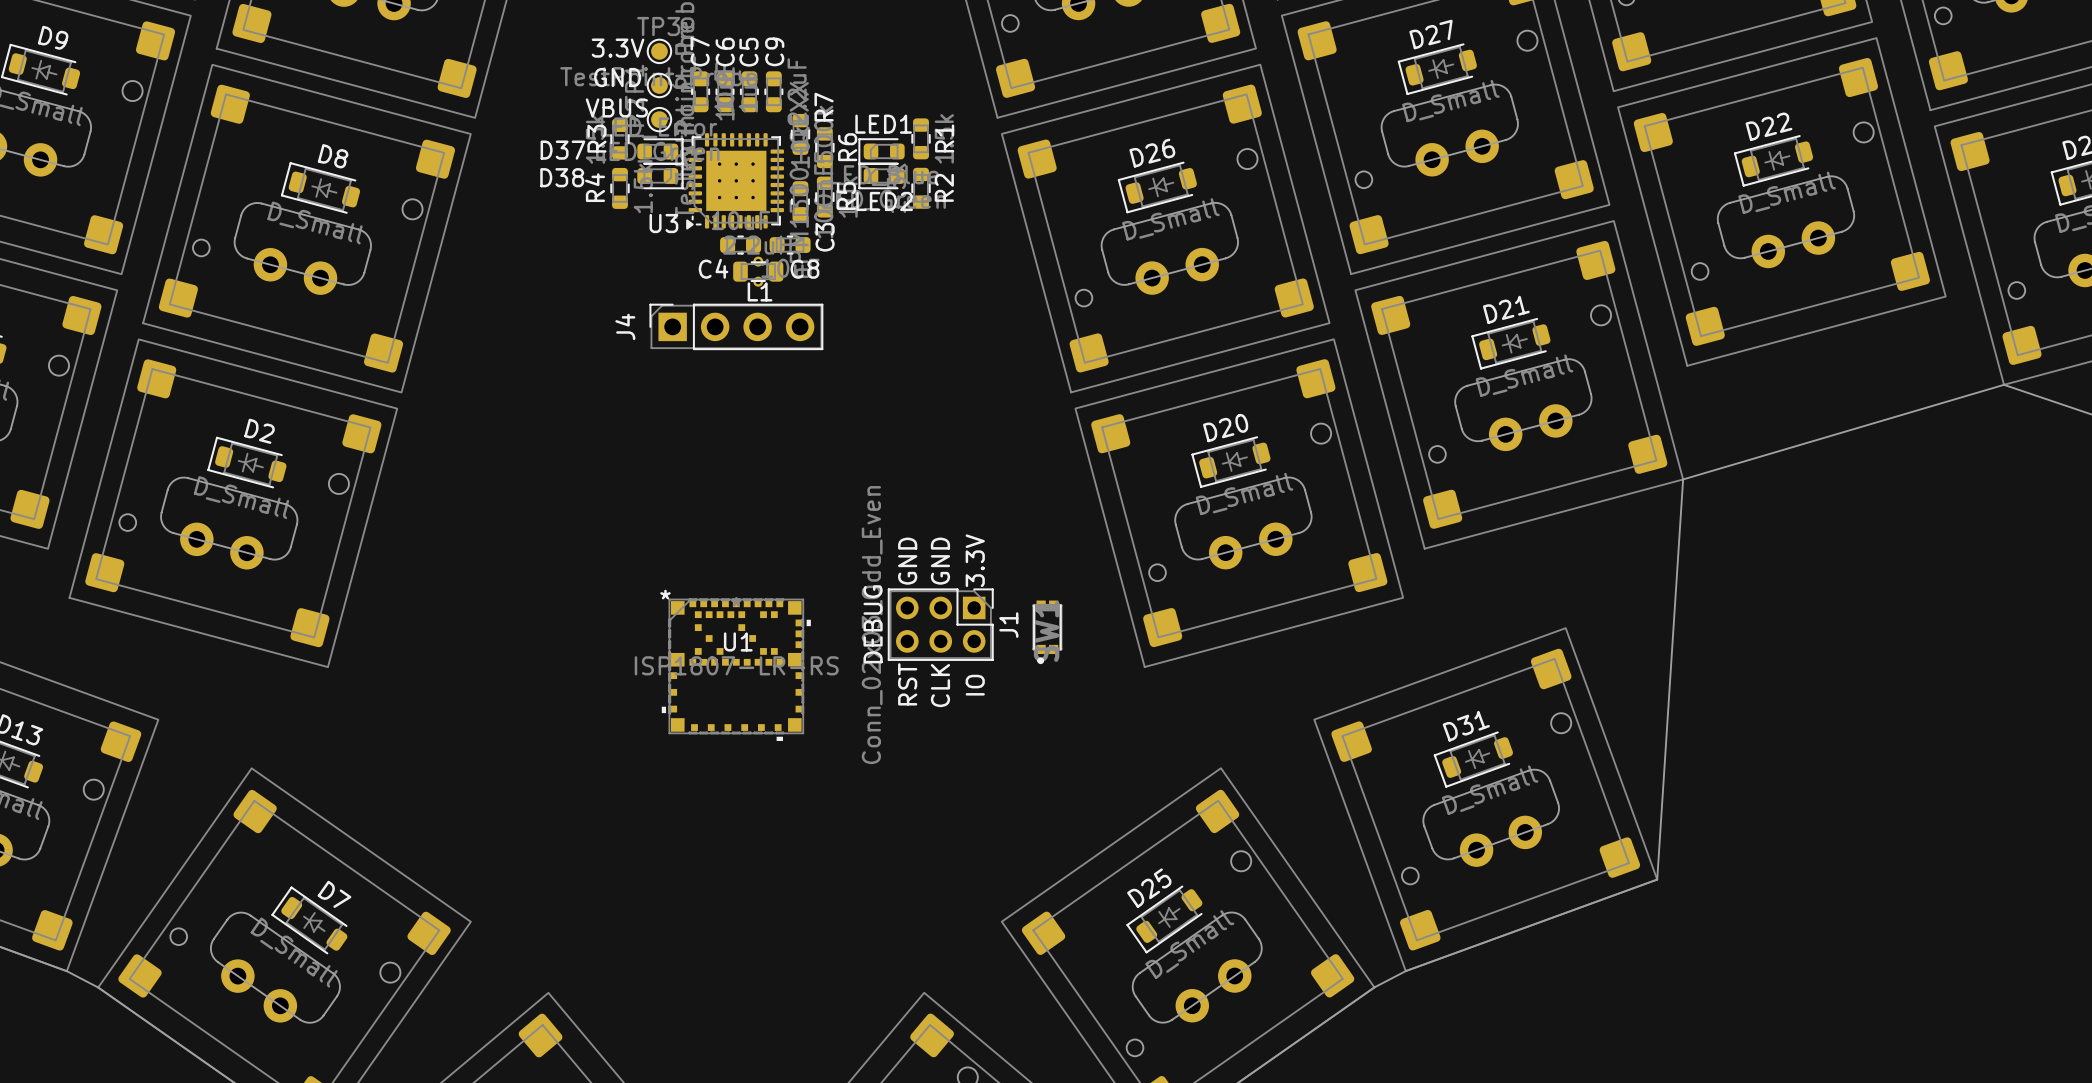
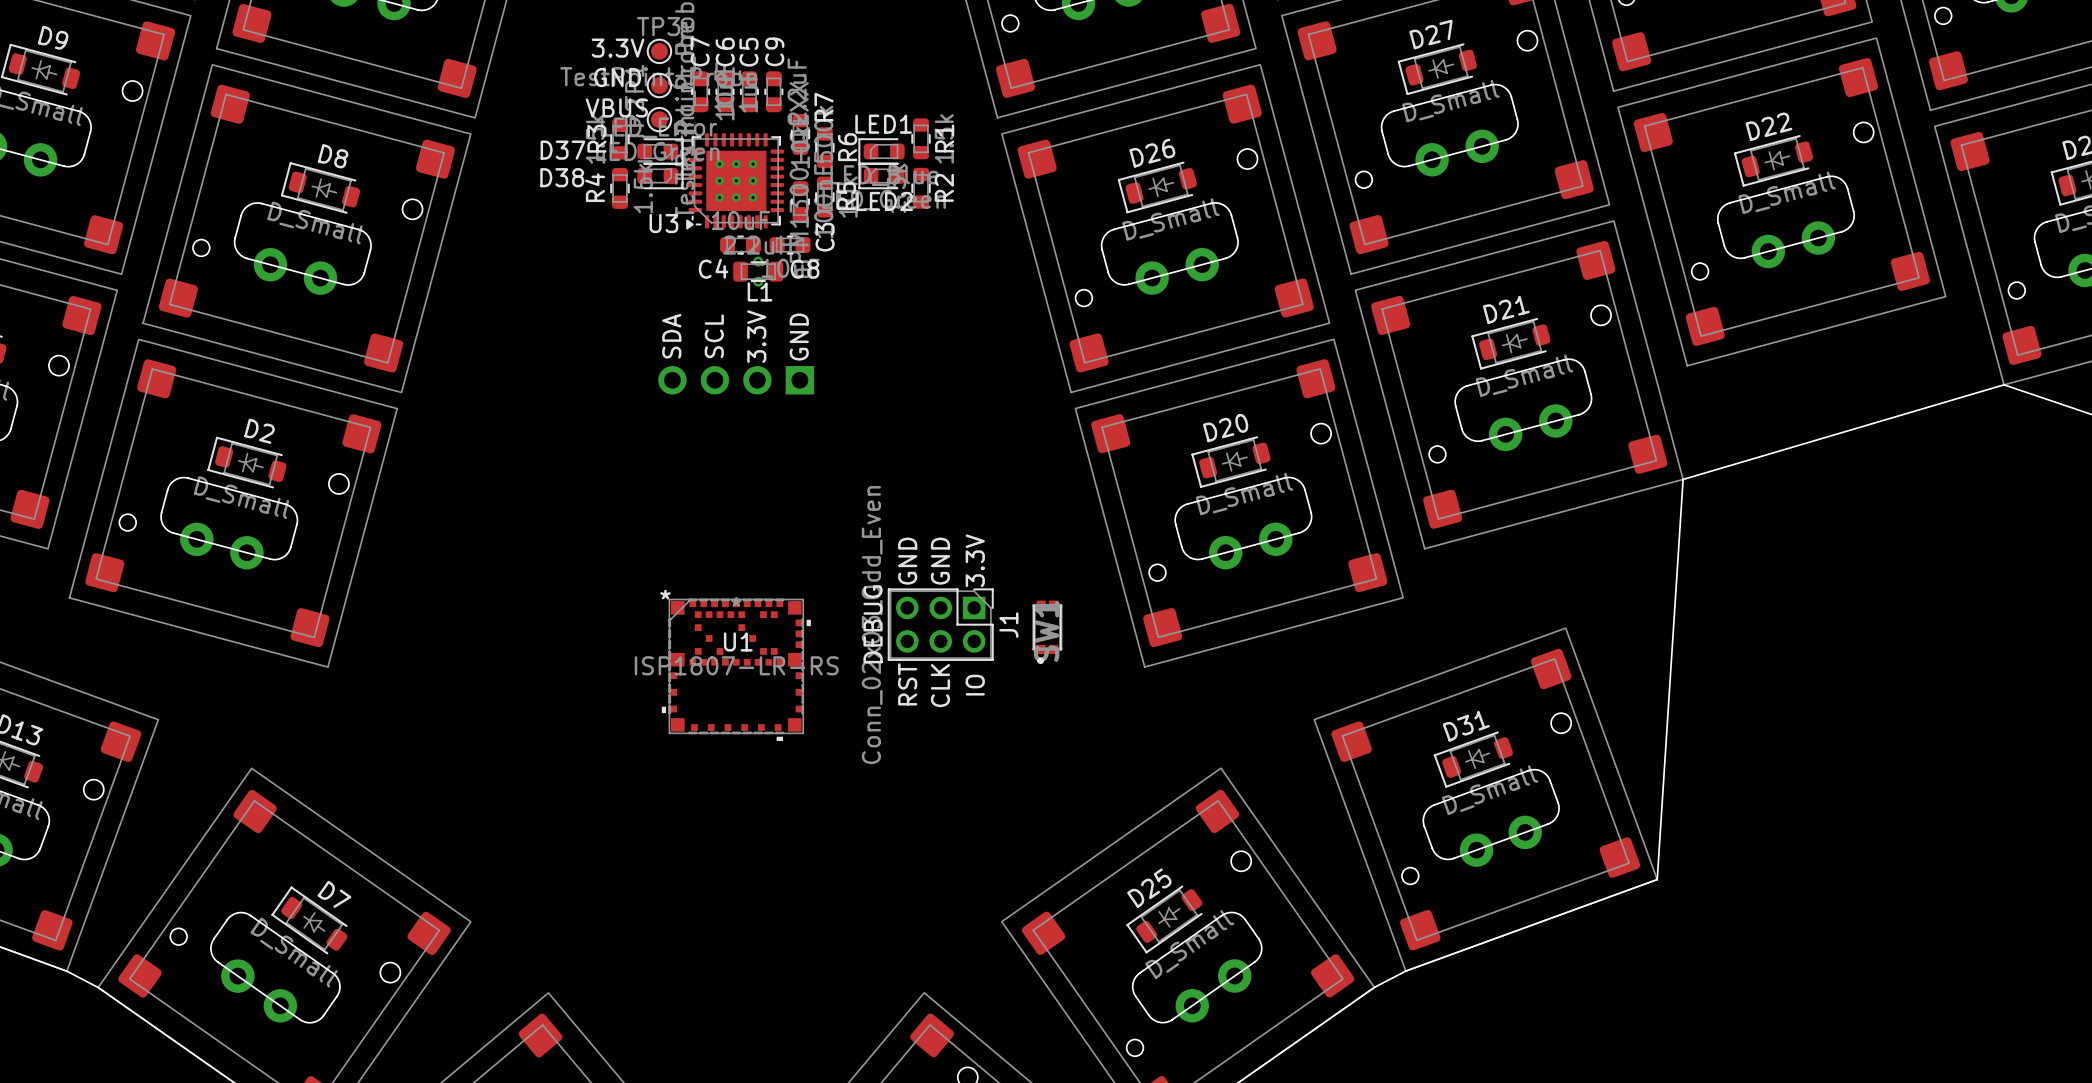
J4 side: top (736, 326) -> bottom (736, 380)
text: none -> SDA (671, 336)
text: none -> SCL (714, 336)
text: none -> 3.3V (756, 336)
text: none -> GND (799, 337)

